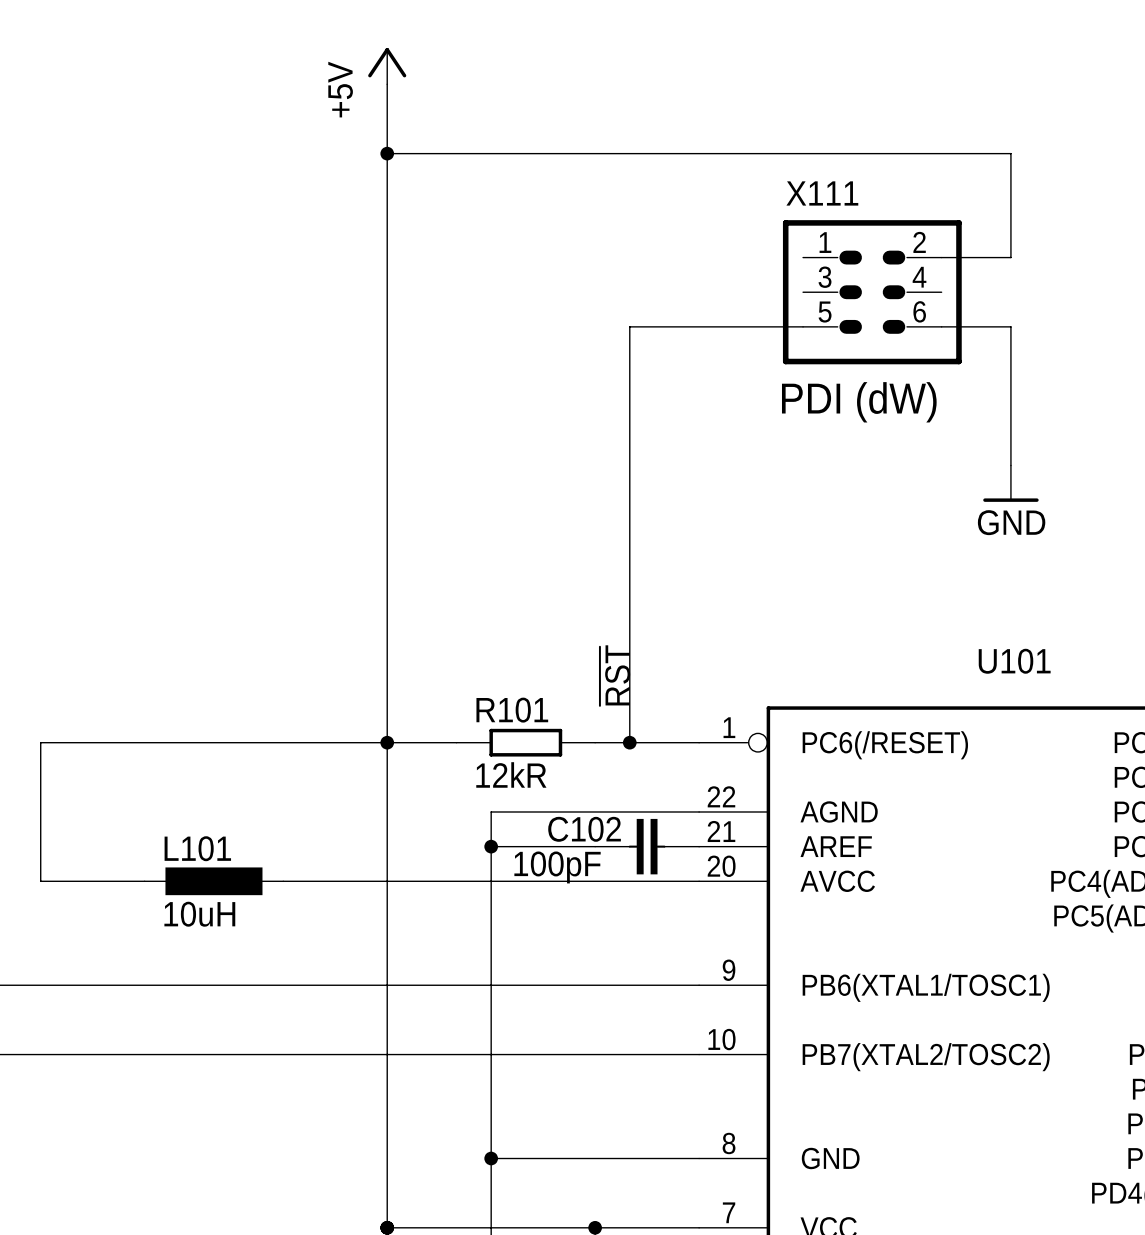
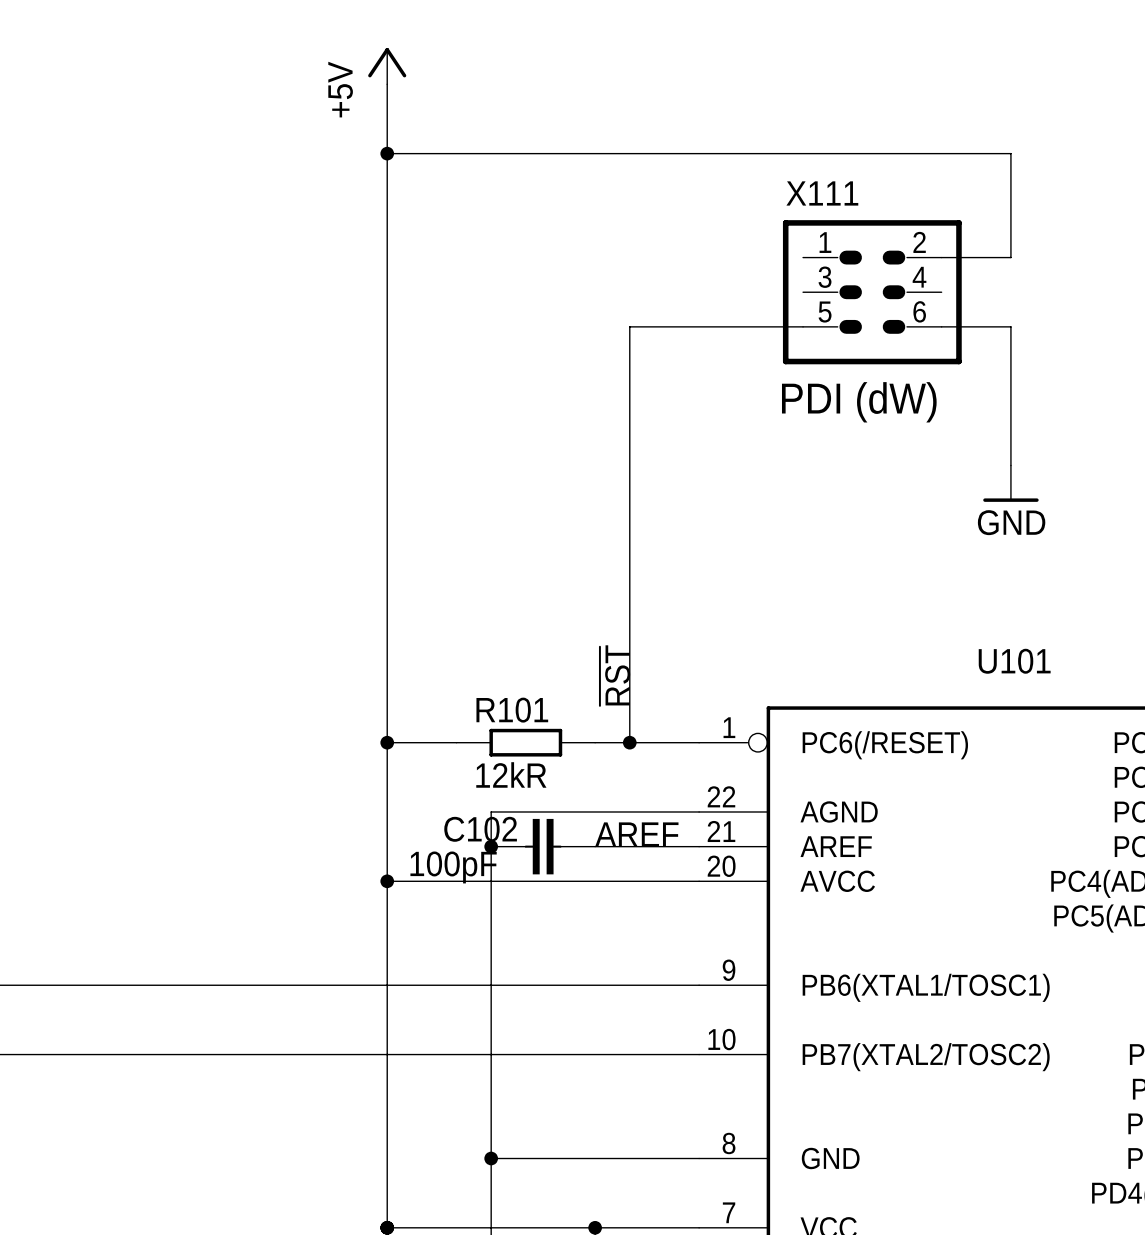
wire: (387, 742) (40, 742) (40, 881) (144, 881) -> none
label: none -> AREF (636, 834)
C102 position: (647, 846) -> (543, 846)
L101: 10uH (213, 881) -> none
wire: (283, 881) (387, 881) -> none
junction: none -> (387, 881)

